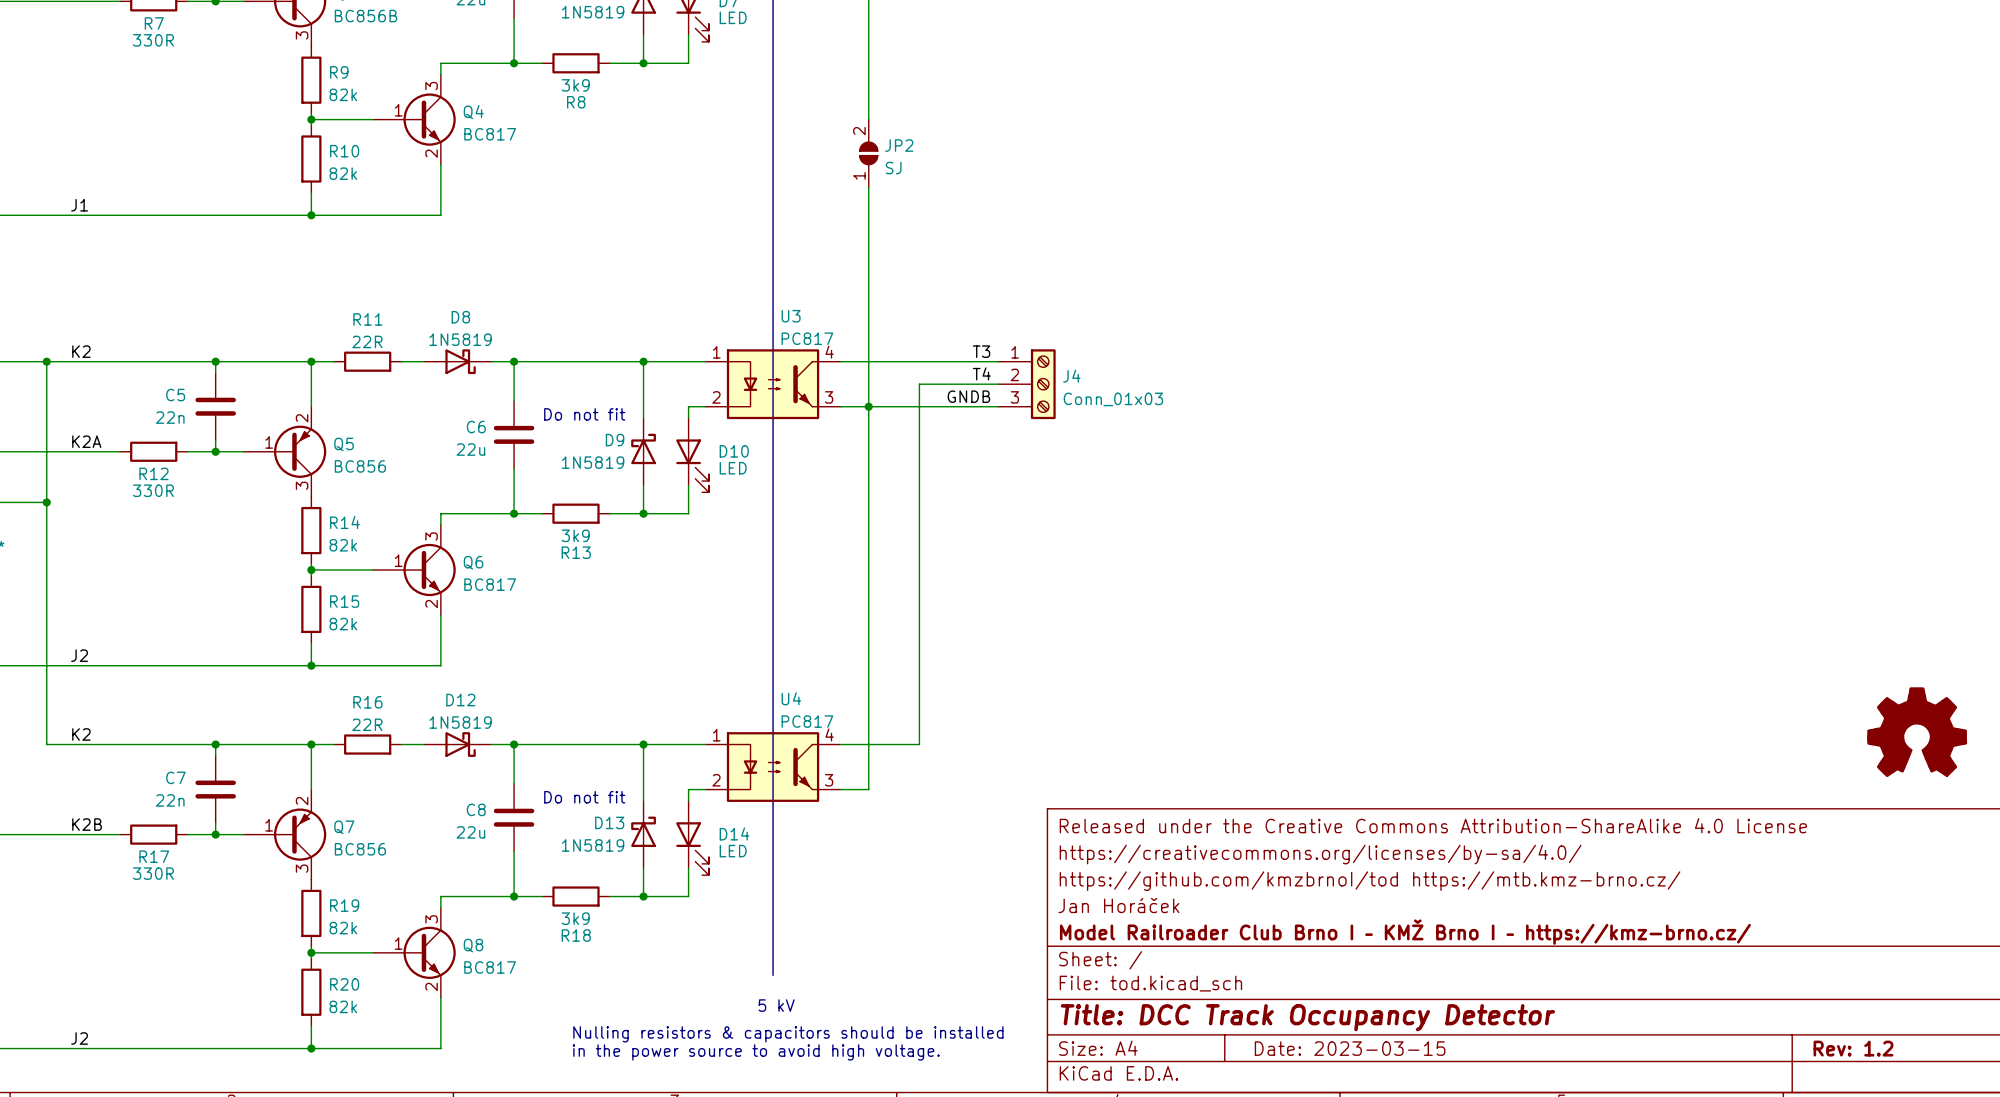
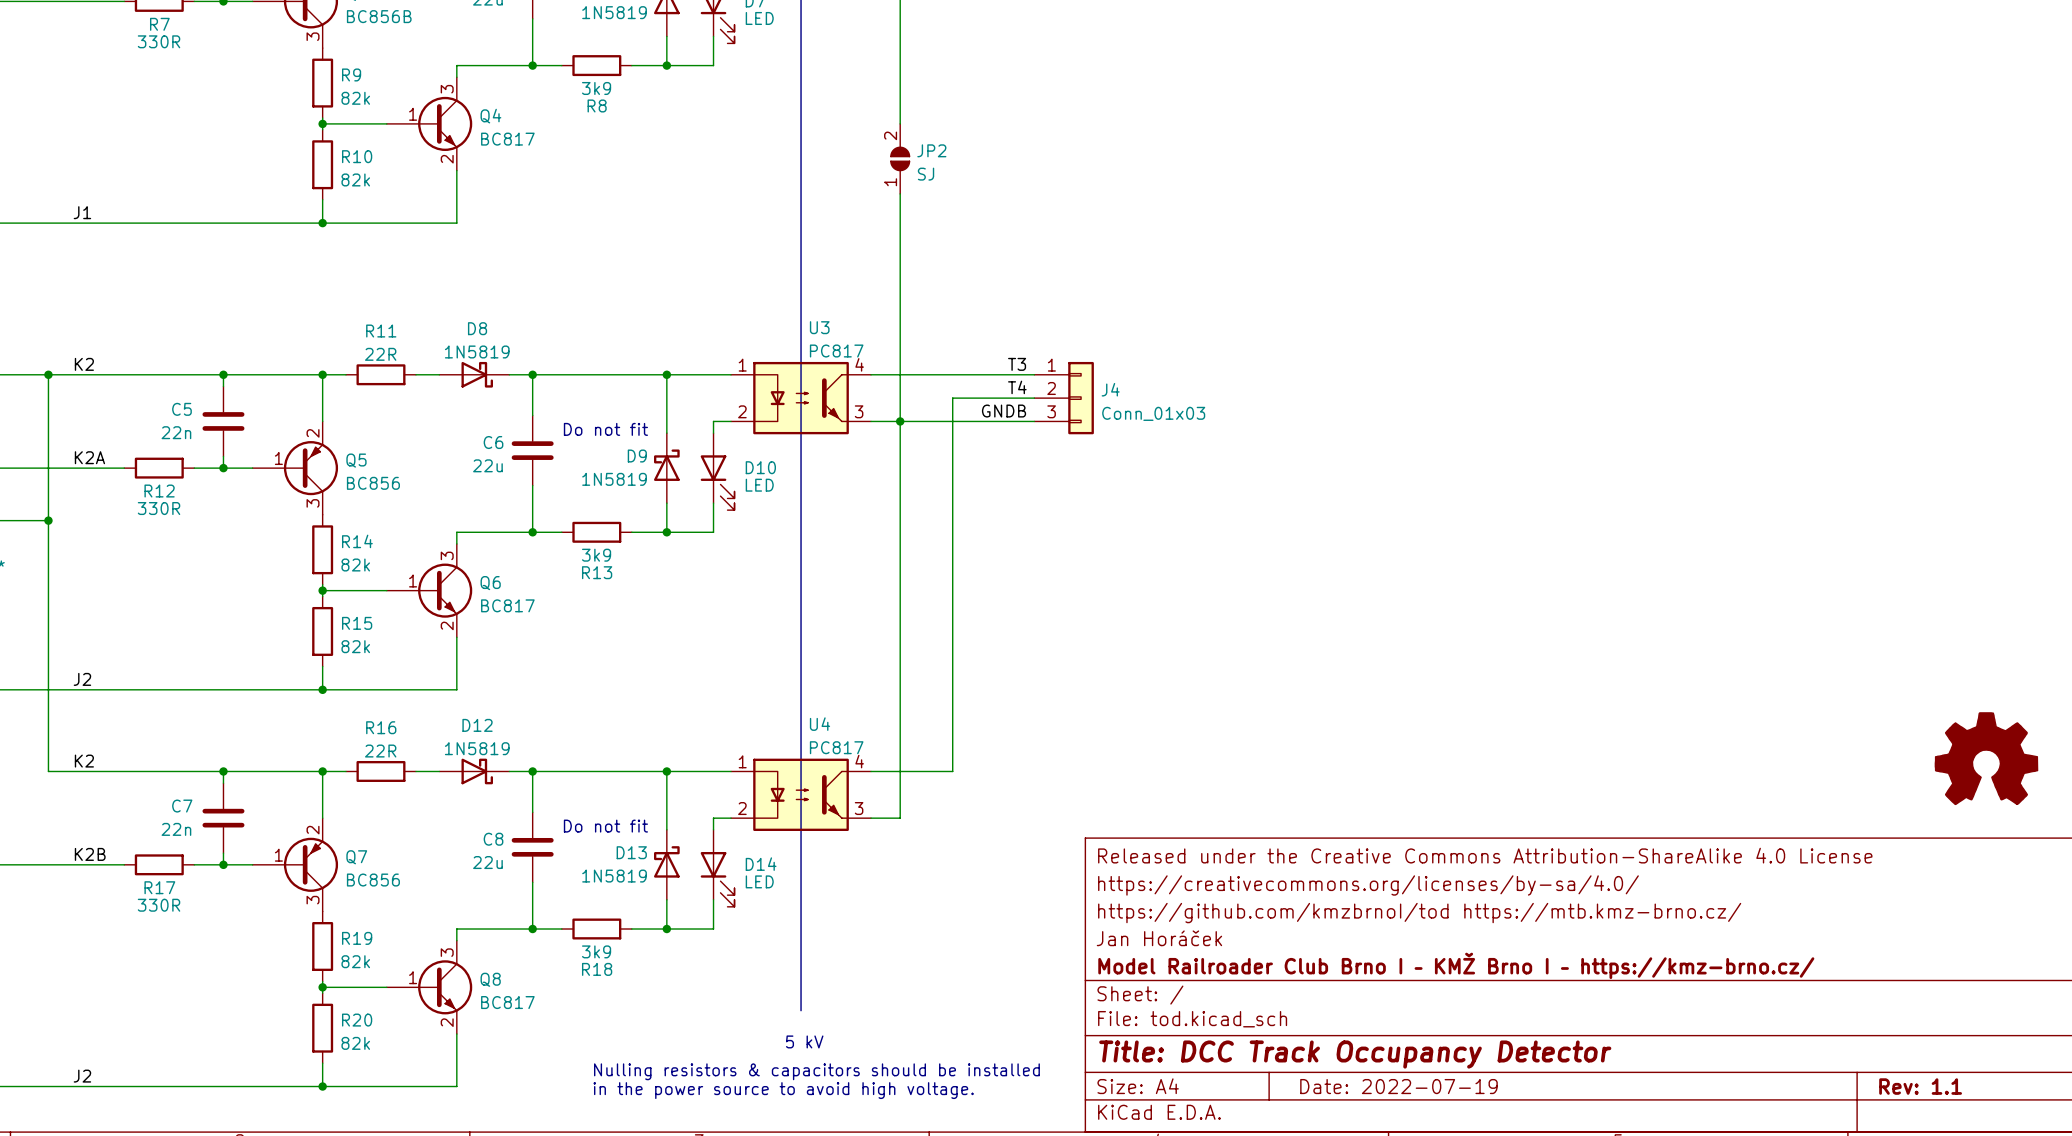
J4 symbol: [998, 349, 1056, 420] -> [1034, 361, 1094, 435]
title block: Date: 2023-03-15 (1350, 1048) -> Date: 2022-07-19 (1398, 1086)
title block: Rev: 1.2 (1853, 1048) -> Rev: 1.1 (1920, 1086)

